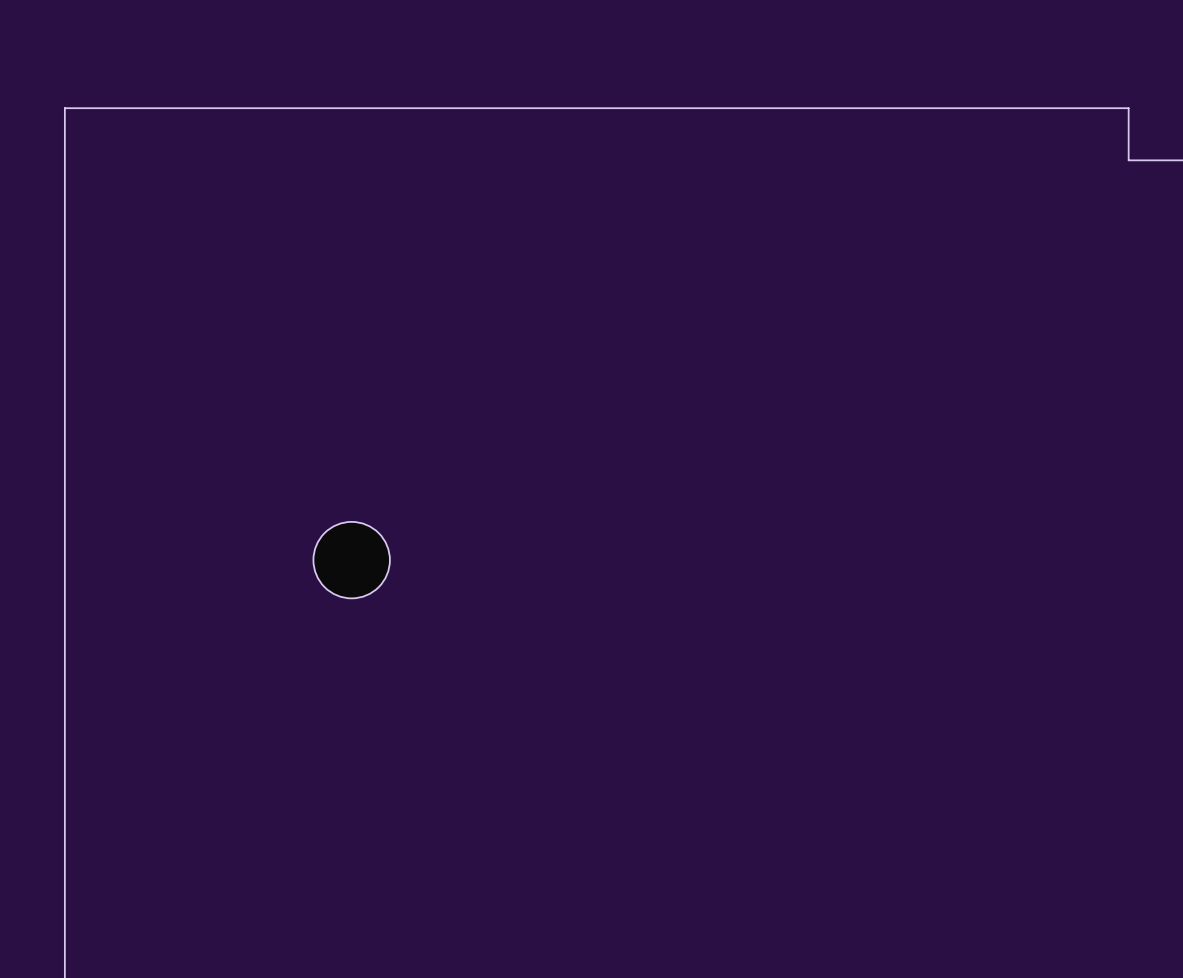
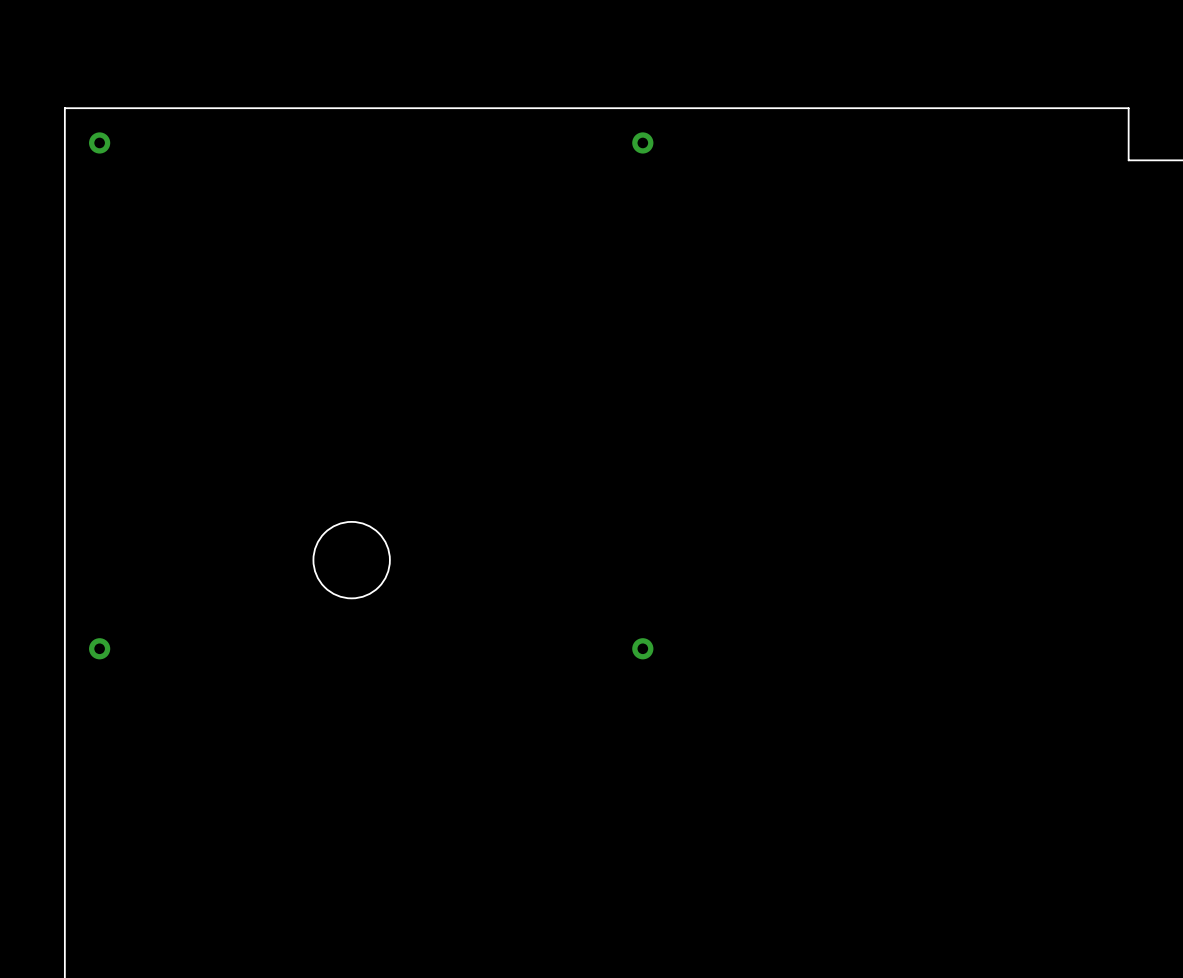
via: none -> (99, 142)
via: none -> (642, 142)
via: none -> (99, 648)
via: none -> (642, 648)

